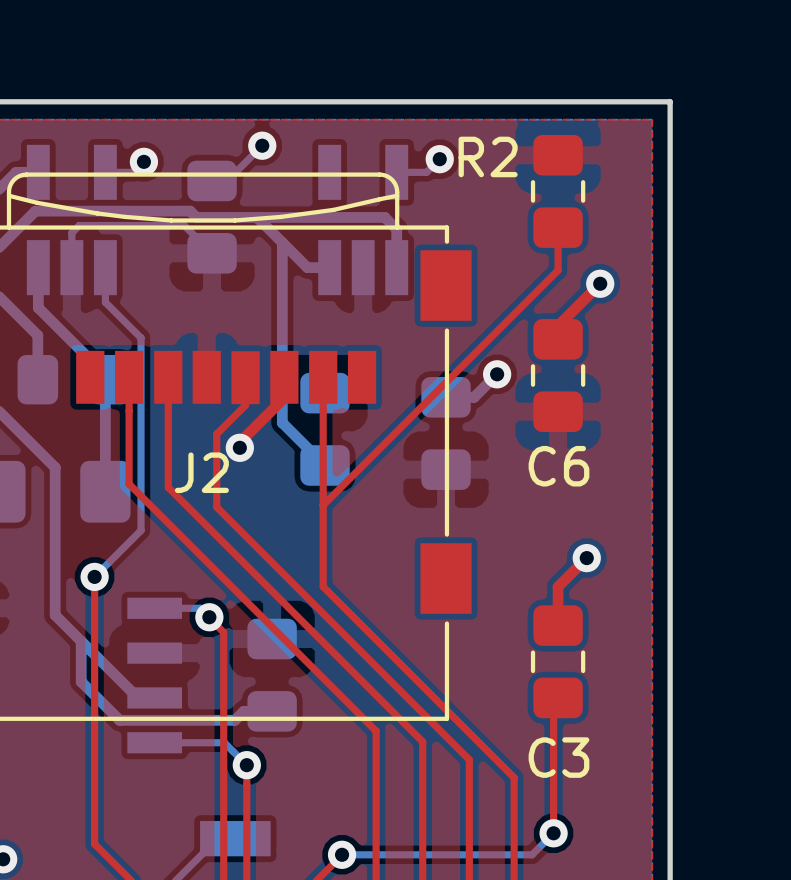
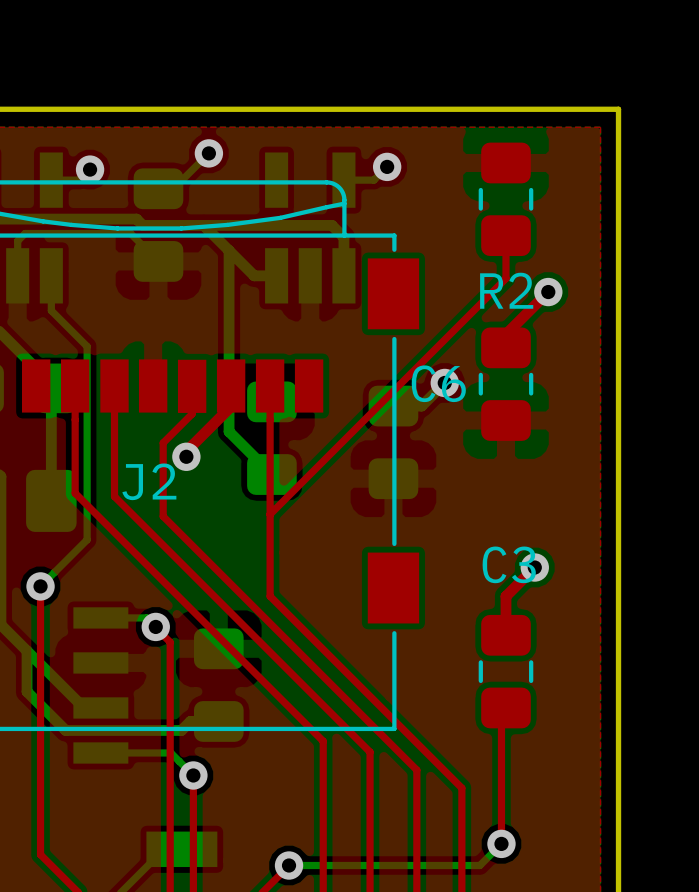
R2 name position: R2 (488, 156) -> R2 (506, 290)
C6 name position: C6 (558, 466) -> C6 (438, 383)
C3 name position: C3 (558, 757) -> C3 (509, 564)

